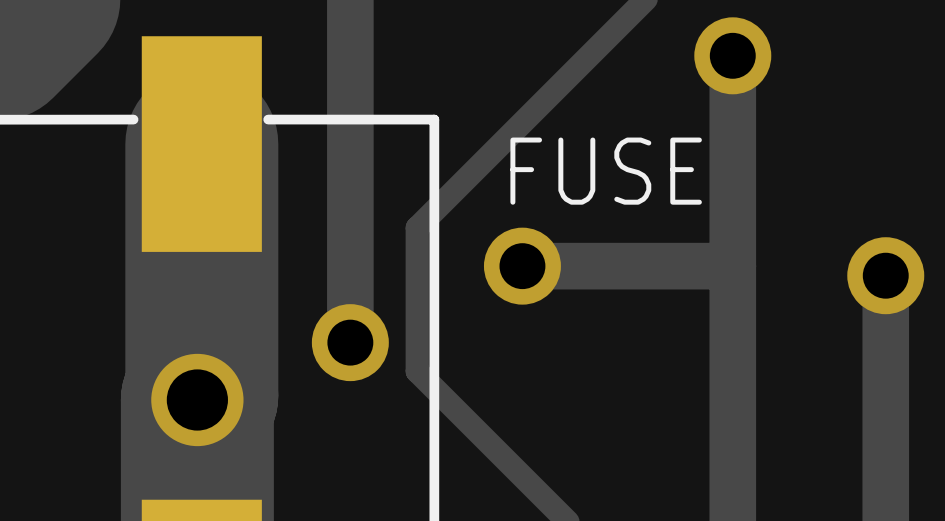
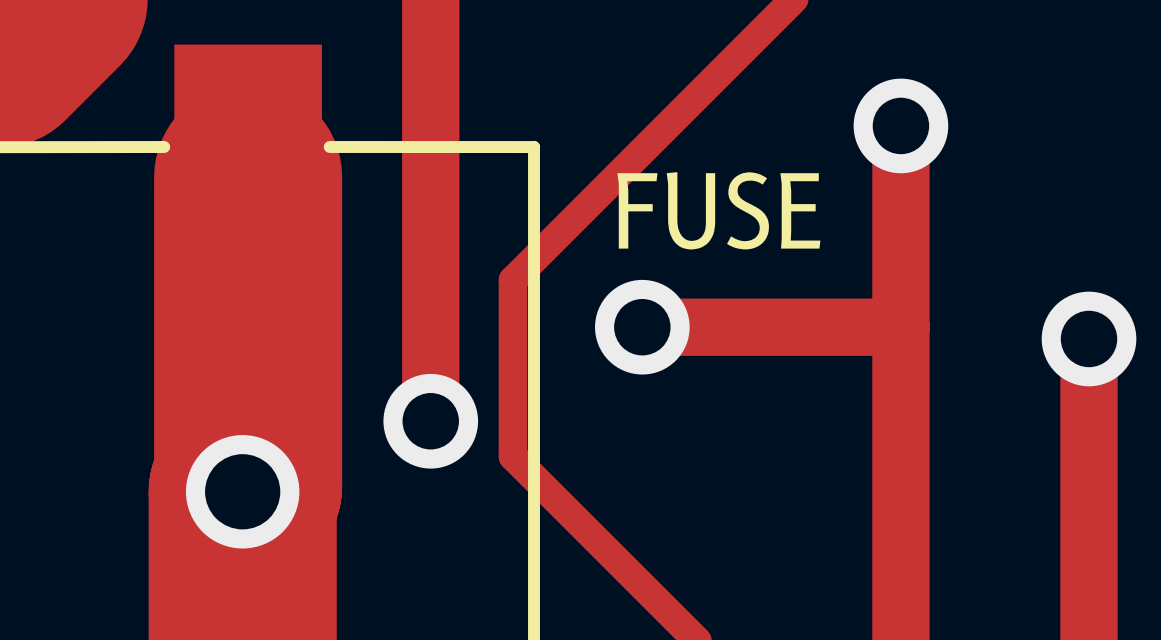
via position: (732, 55) -> (900, 125)

